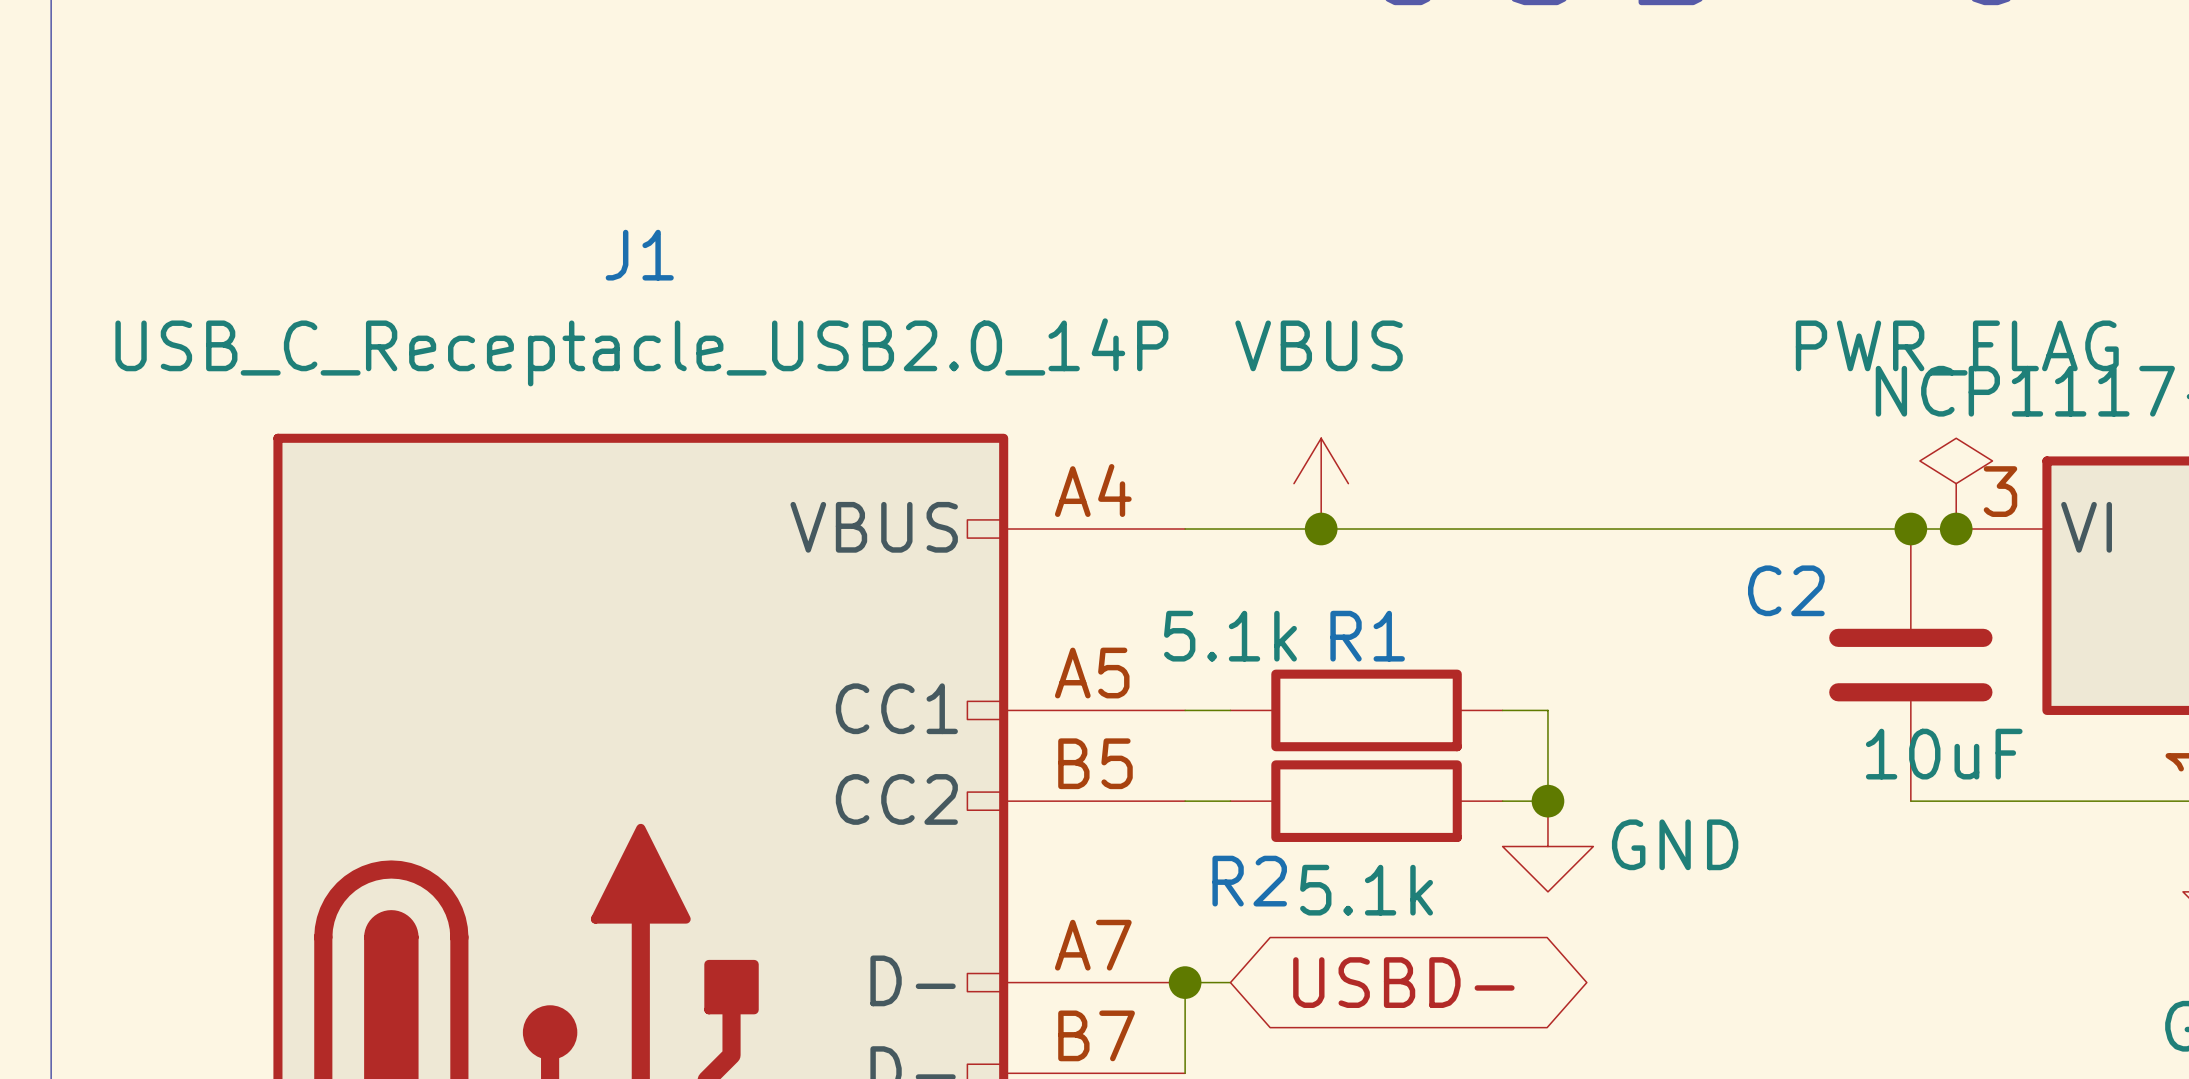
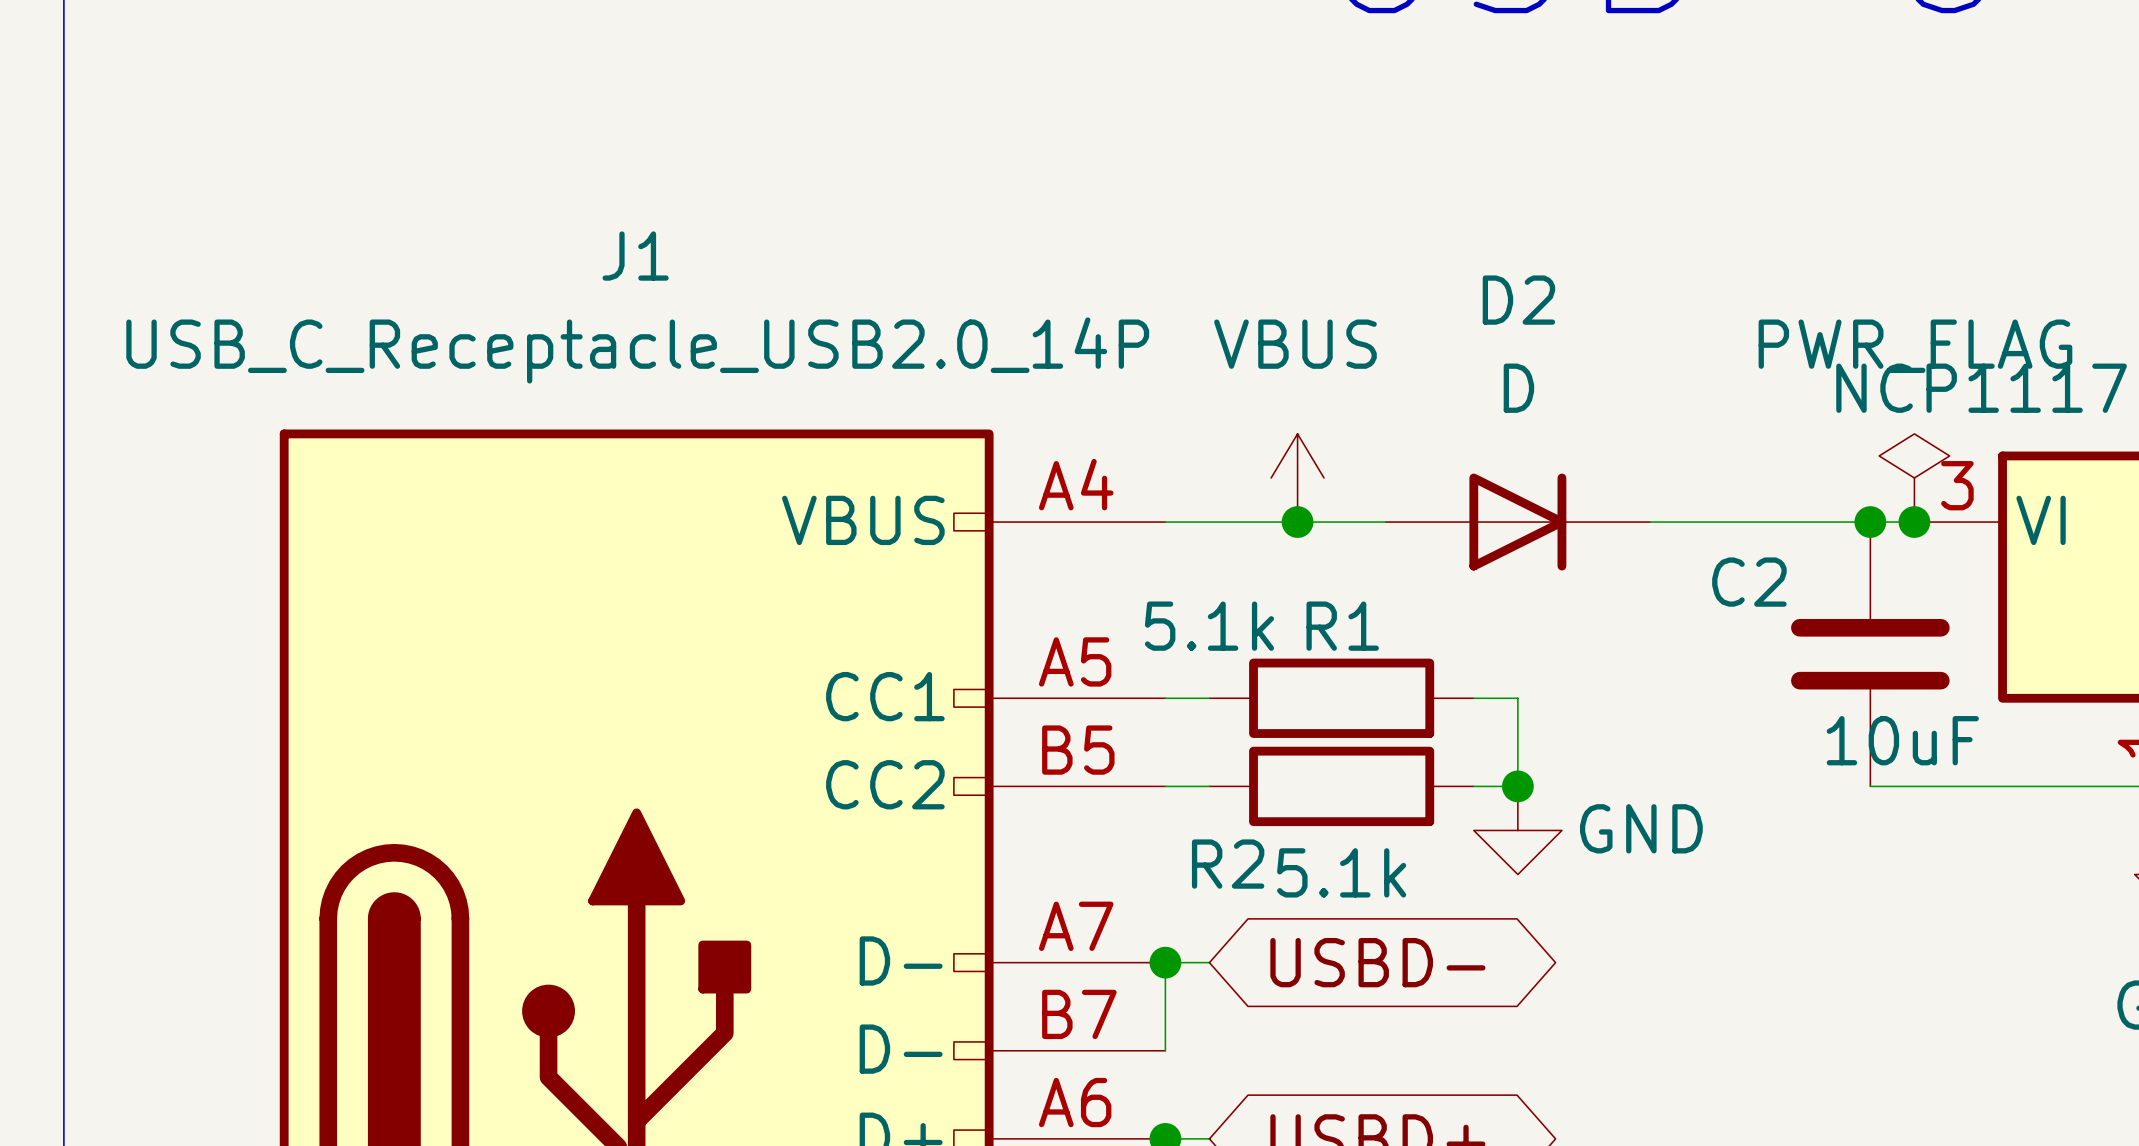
D2: none -> D (1517, 522)

